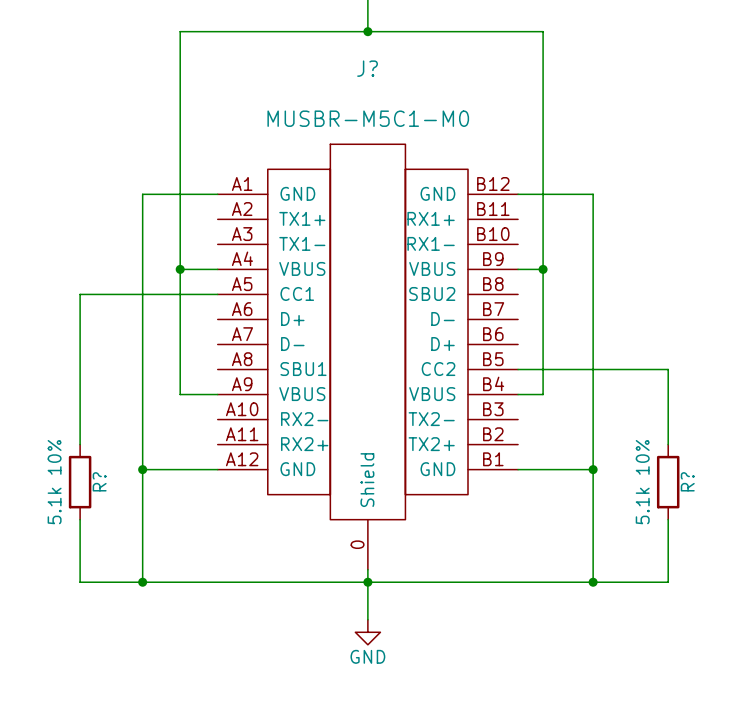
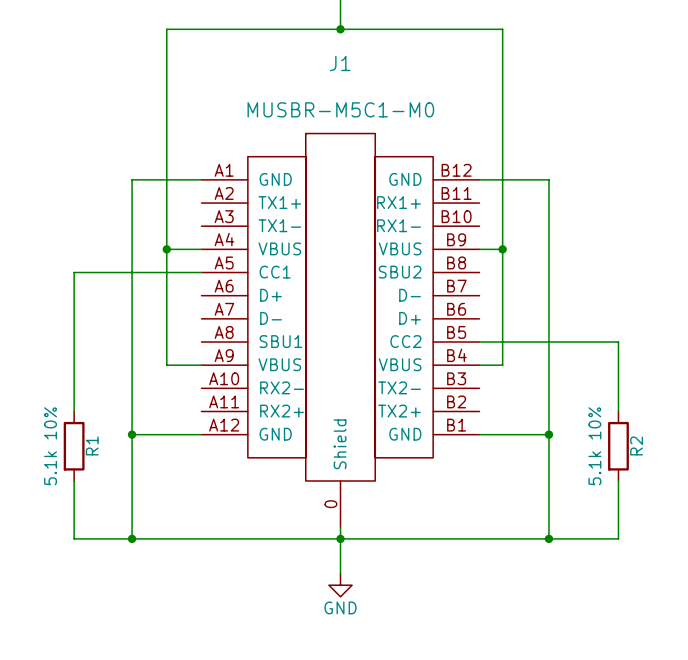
J? name: J? (367, 68) -> J1 (340, 63)
R? name: R? (99, 481) -> R1 (92, 445)
R? name: R? (687, 481) -> R2 (636, 445)

